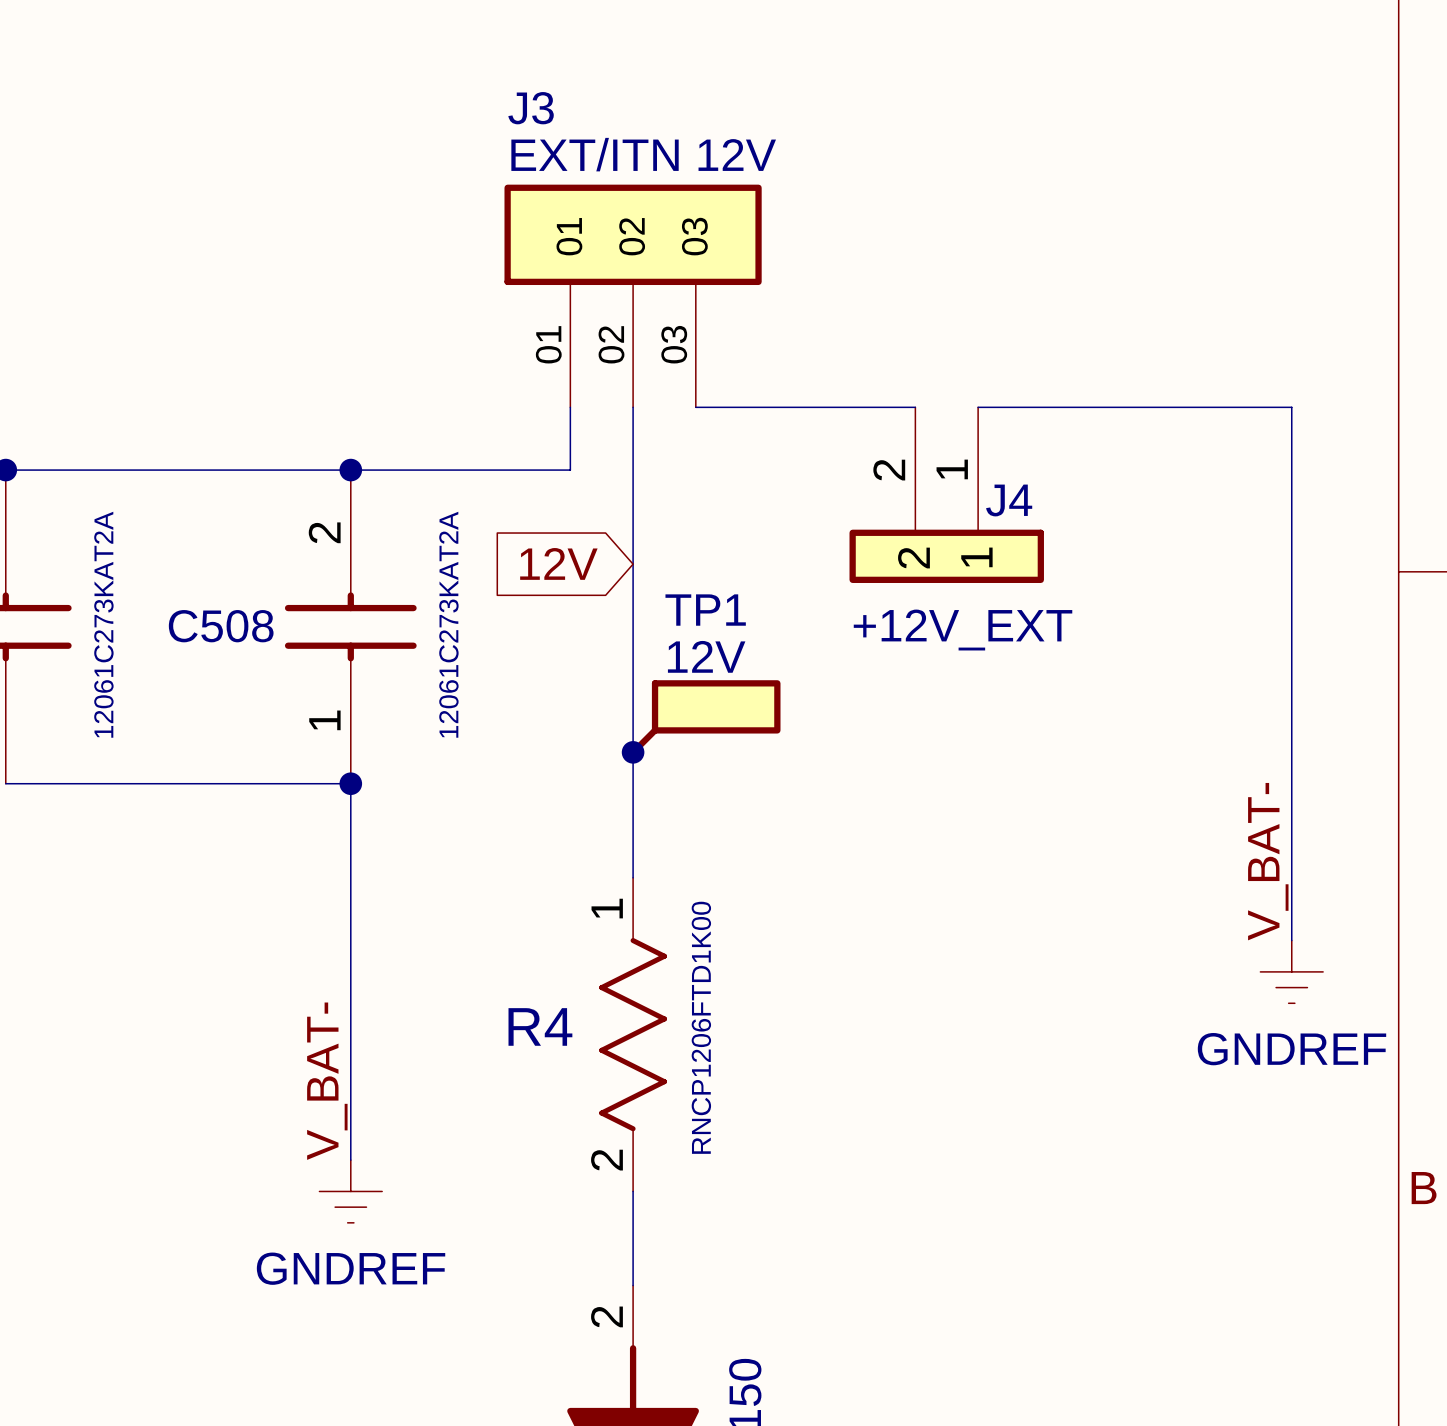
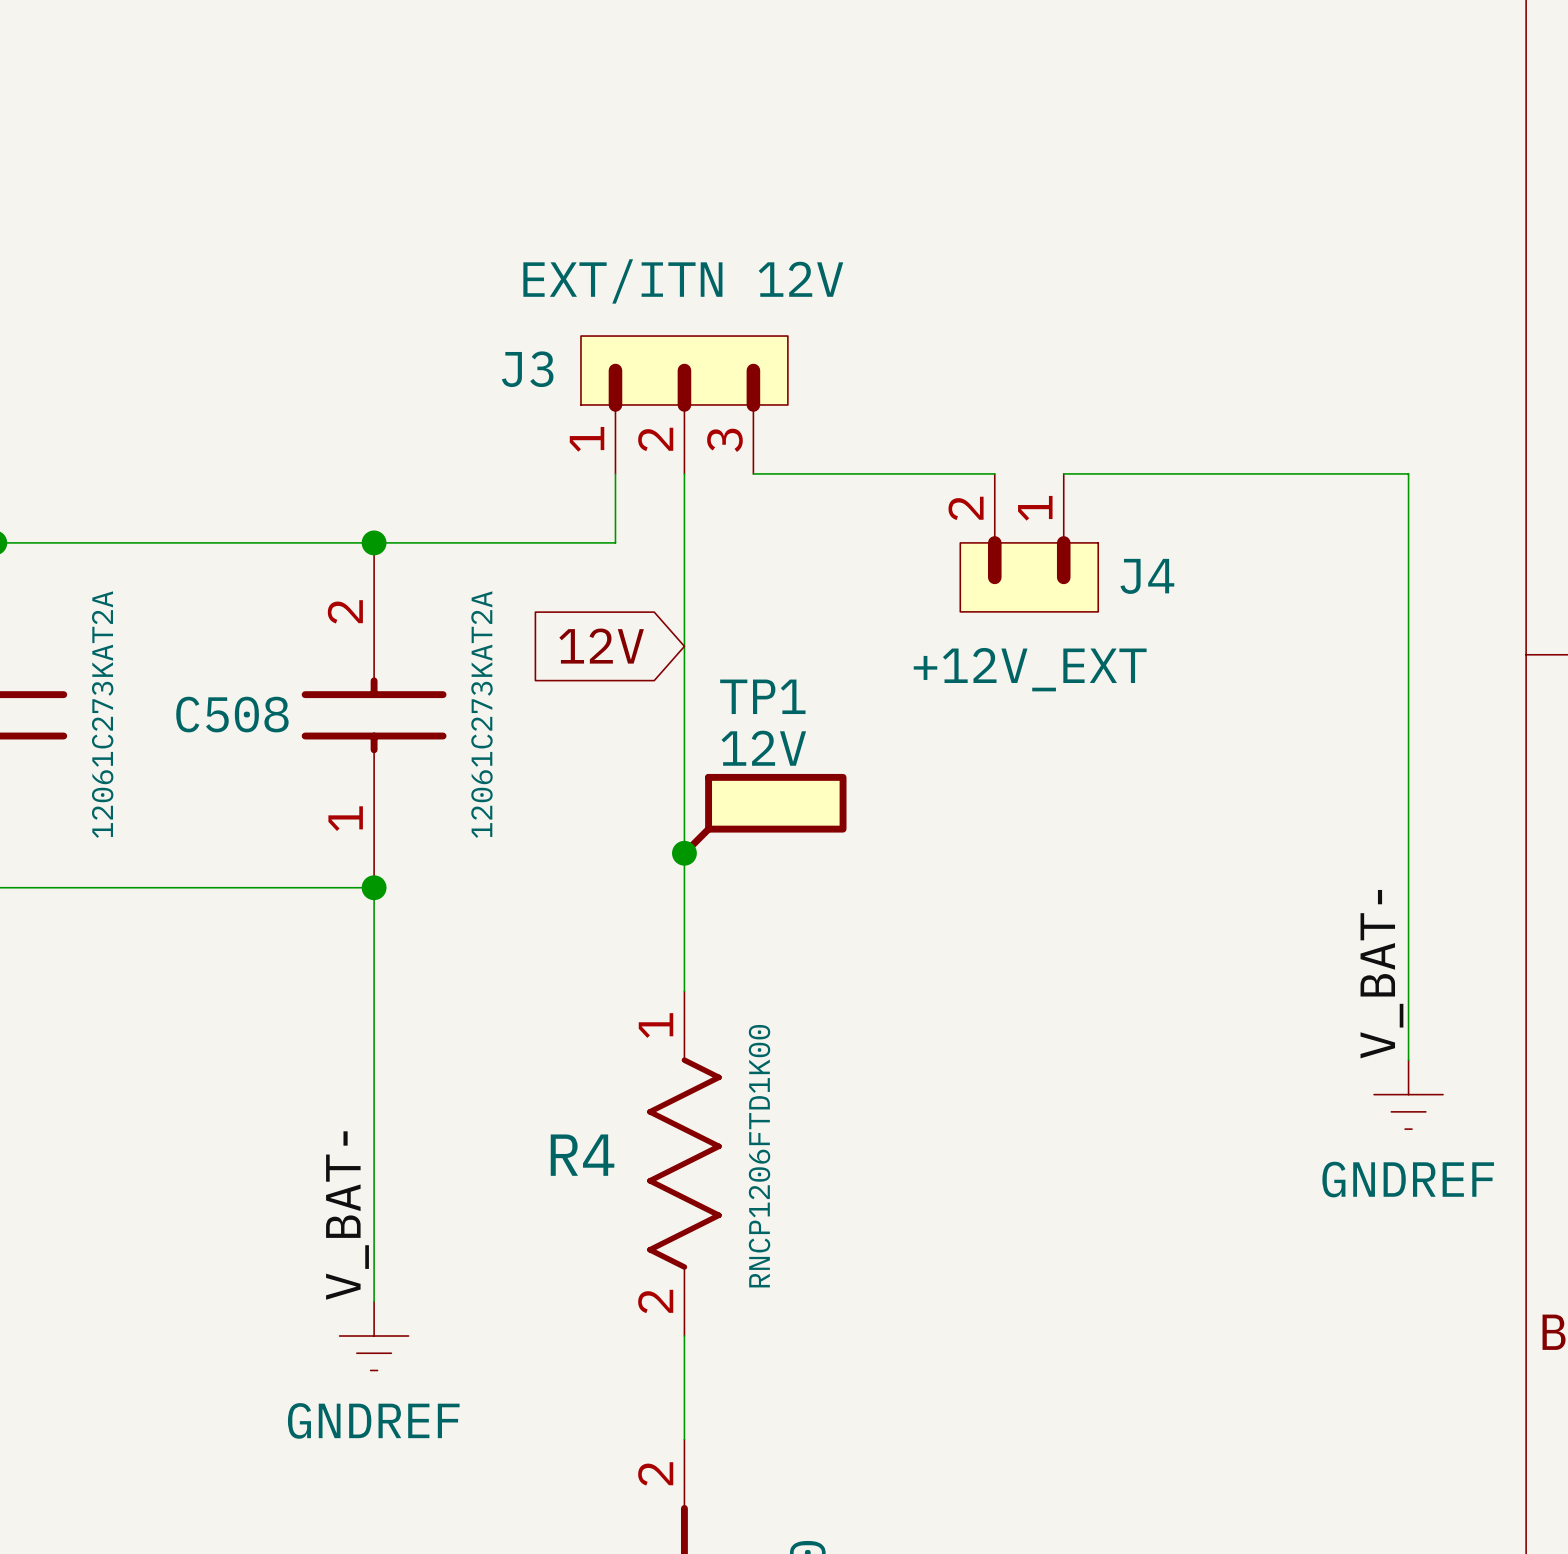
J3 name position: J3 (531, 108) -> J3 (527, 369)
J3 symbol: [504, 184, 762, 408] -> [580, 336, 788, 474]
J4 symbol: [849, 407, 1044, 583] -> [960, 473, 1099, 612]
J4 name position: J4 (1009, 500) -> J4 (1147, 576)

